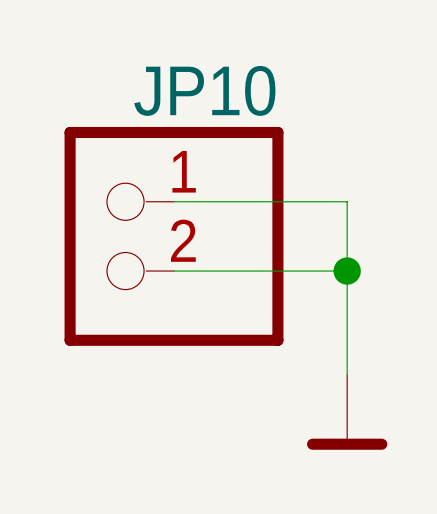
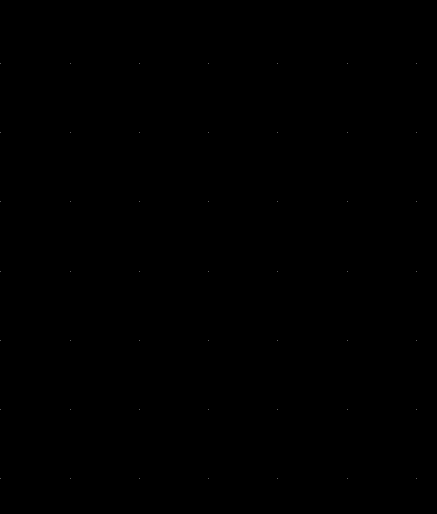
wire: (174, 201) (347, 201) (347, 374) -> none
JP10: (174, 236) -> none
wire: (174, 271) (347, 271) -> none
junction: (347, 271) -> none
power symbol: (347, 412) -> none

